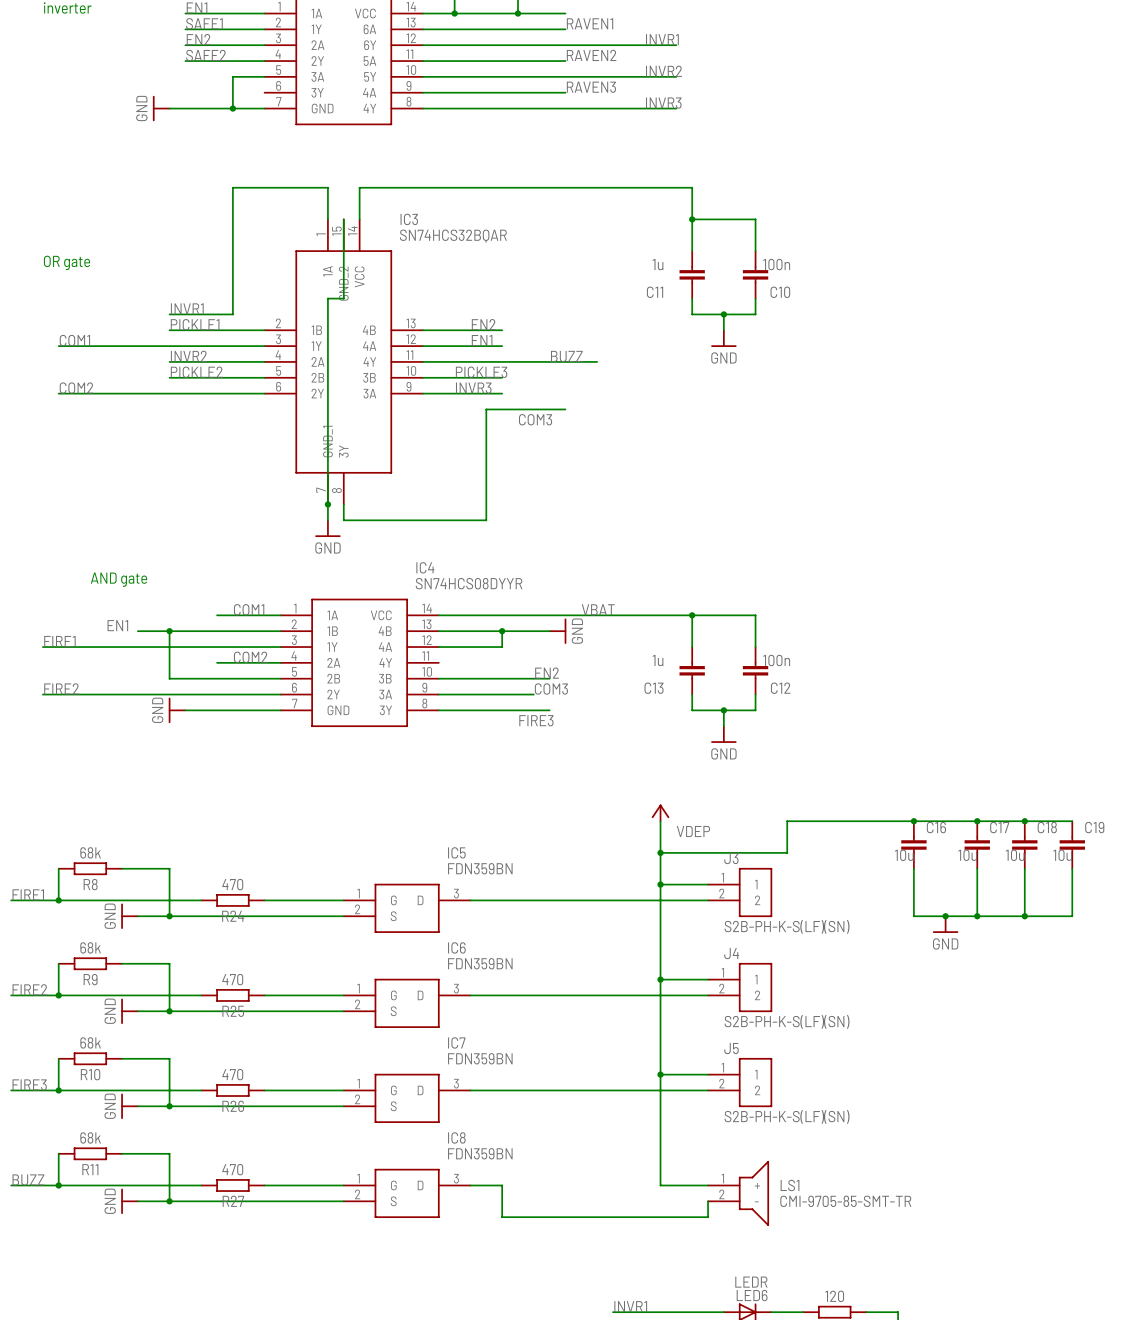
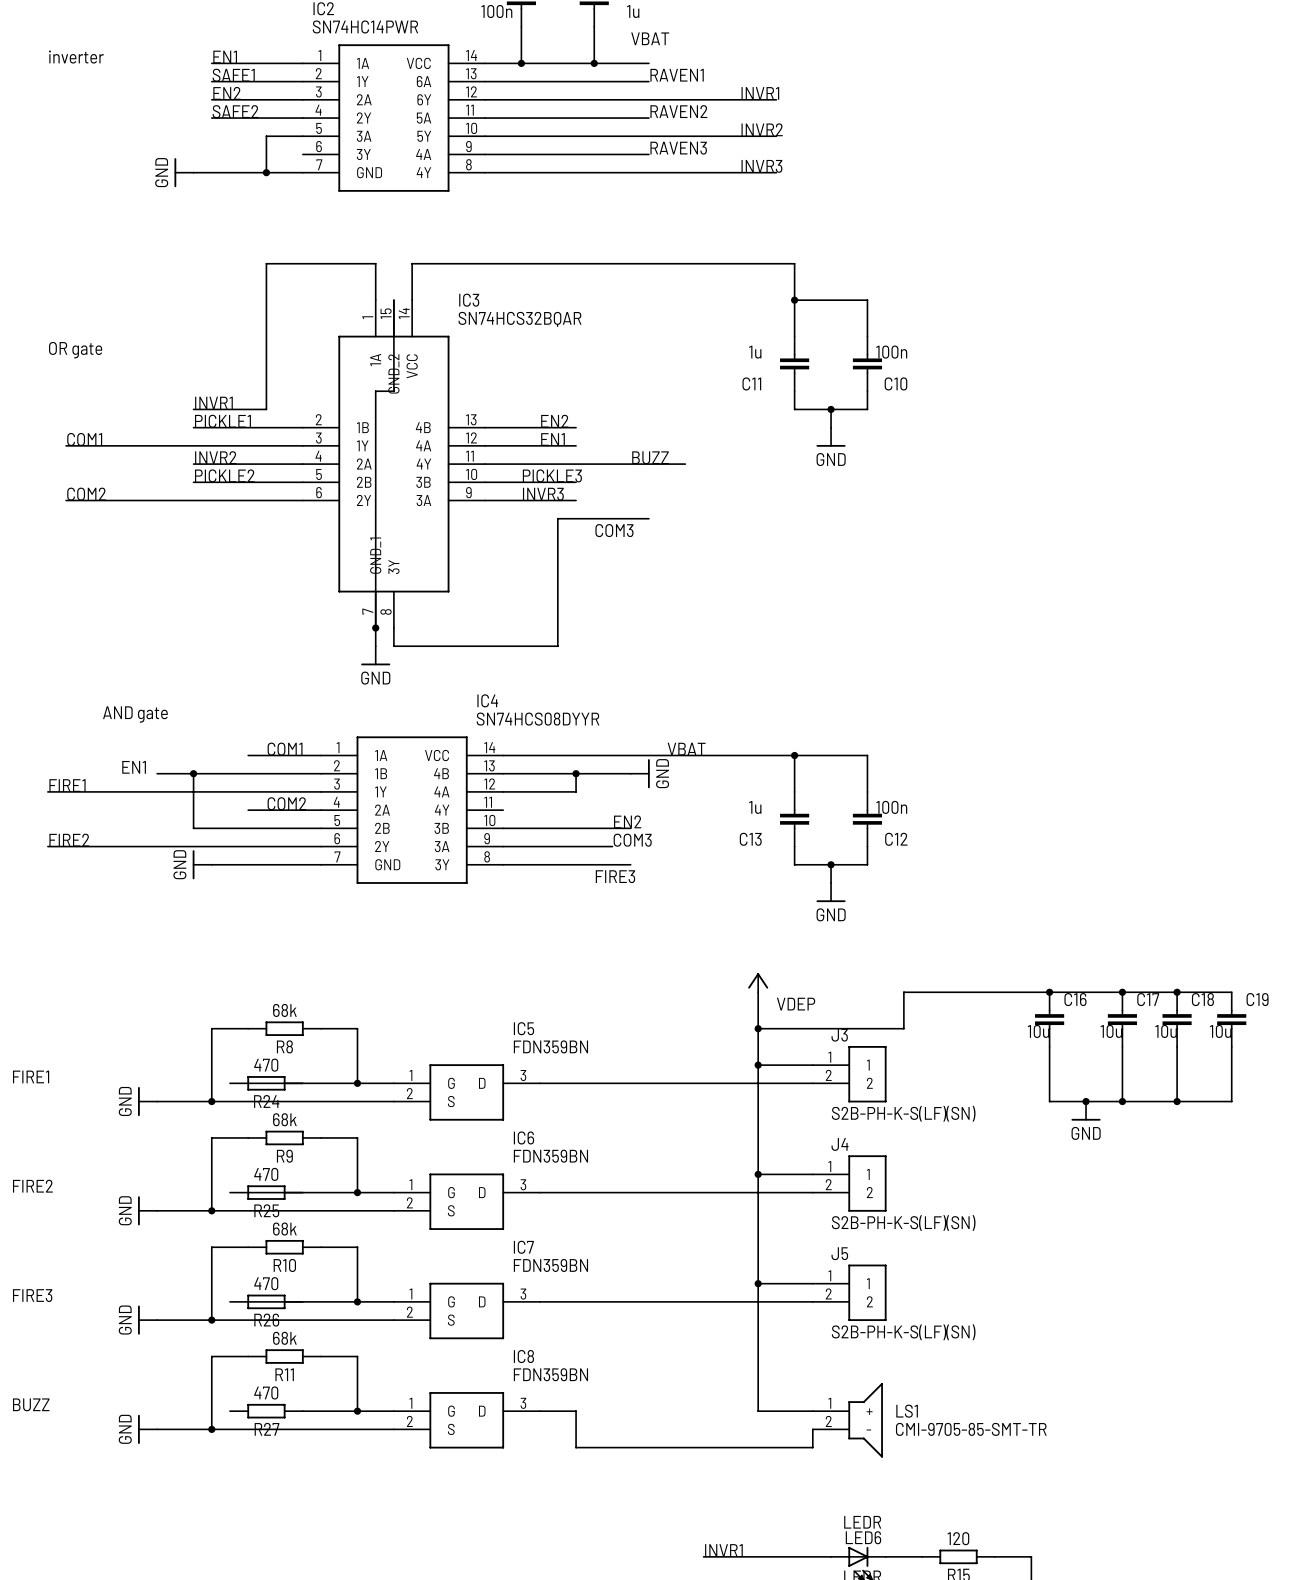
wire: none -> (248, 1028) (211, 1028) (211, 1101)
wire: none -> (321, 1028) (357, 1028) (357, 1083)
wire: (58, 868) (58, 900) -> none
R8 position: (90, 868) -> (284, 1028)
wire: (122, 868) (169, 868) (169, 916) -> none
wire: (11, 900) (201, 900) -> none
junction: (58, 900) -> none
wire: none -> (248, 1083) (302, 1083)
junction: none -> (357, 1083)
junction position: (169, 916) -> (211, 1101)
wire: none -> (248, 1137) (211, 1137) (211, 1210)
wire: none -> (321, 1137) (357, 1137) (357, 1192)
wire: (58, 963) (58, 995) -> none
R9 position: (90, 963) -> (284, 1137)
wire: (122, 963) (169, 963) (169, 1011) -> none
wire: (11, 995) (201, 995) -> none
junction: (58, 995) -> none
wire: none -> (248, 1192) (302, 1192)
junction: none -> (357, 1192)
junction position: (169, 1011) -> (211, 1210)
wire: none -> (248, 1247) (211, 1247) (211, 1320)
wire: none -> (321, 1247) (357, 1247) (357, 1301)
wire: (58, 1058) (58, 1090) -> none
R10 position: (90, 1058) -> (284, 1247)
wire: (122, 1058) (169, 1058) (169, 1106) -> none
wire: (11, 1090) (201, 1090) -> none
junction: (58, 1090) -> none
wire: none -> (248, 1301) (302, 1301)
junction: none -> (357, 1301)
junction position: (169, 1106) -> (211, 1320)
wire: none -> (248, 1356) (211, 1356) (211, 1429)
wire: none -> (321, 1356) (357, 1356) (357, 1411)
wire: (58, 1153) (58, 1185) -> none
R11 position: (90, 1153) -> (284, 1356)
wire: (122, 1153) (169, 1153) (169, 1201) -> none
wire: (11, 1185) (201, 1185) -> none
junction: (58, 1185) -> none
junction: none -> (357, 1411)
junction position: (169, 1201) -> (211, 1429)

